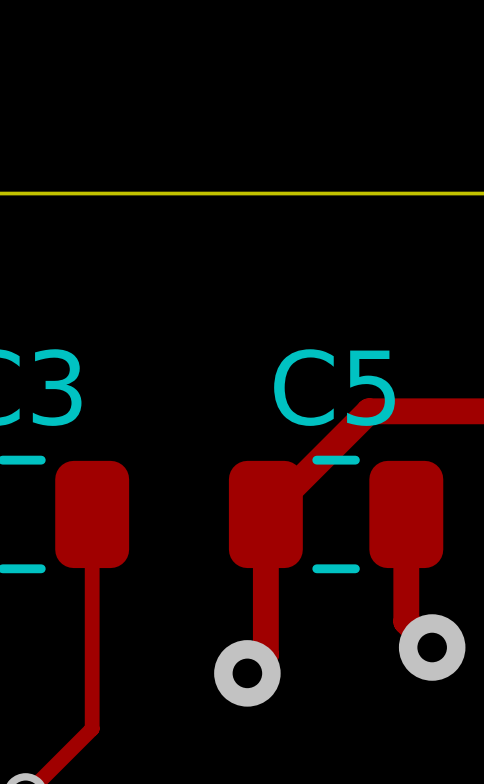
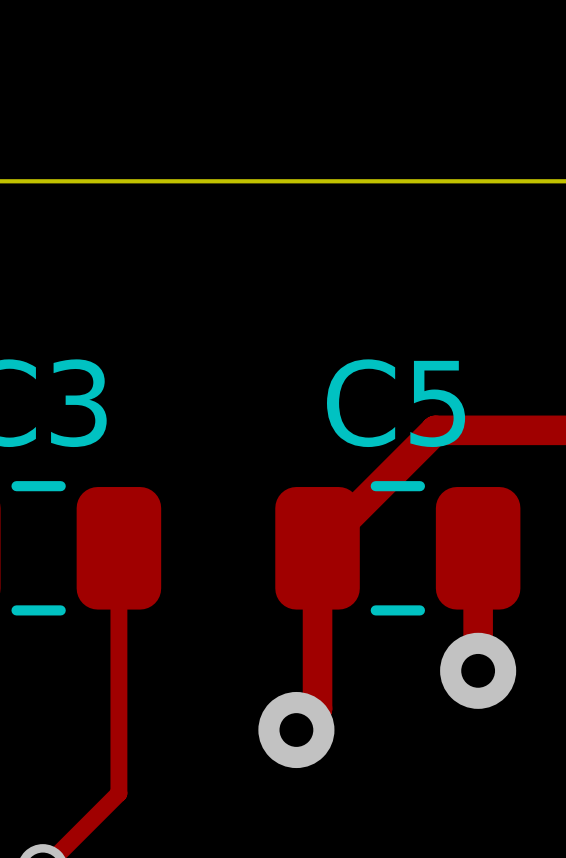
via position: (432, 647) -> (478, 670)

